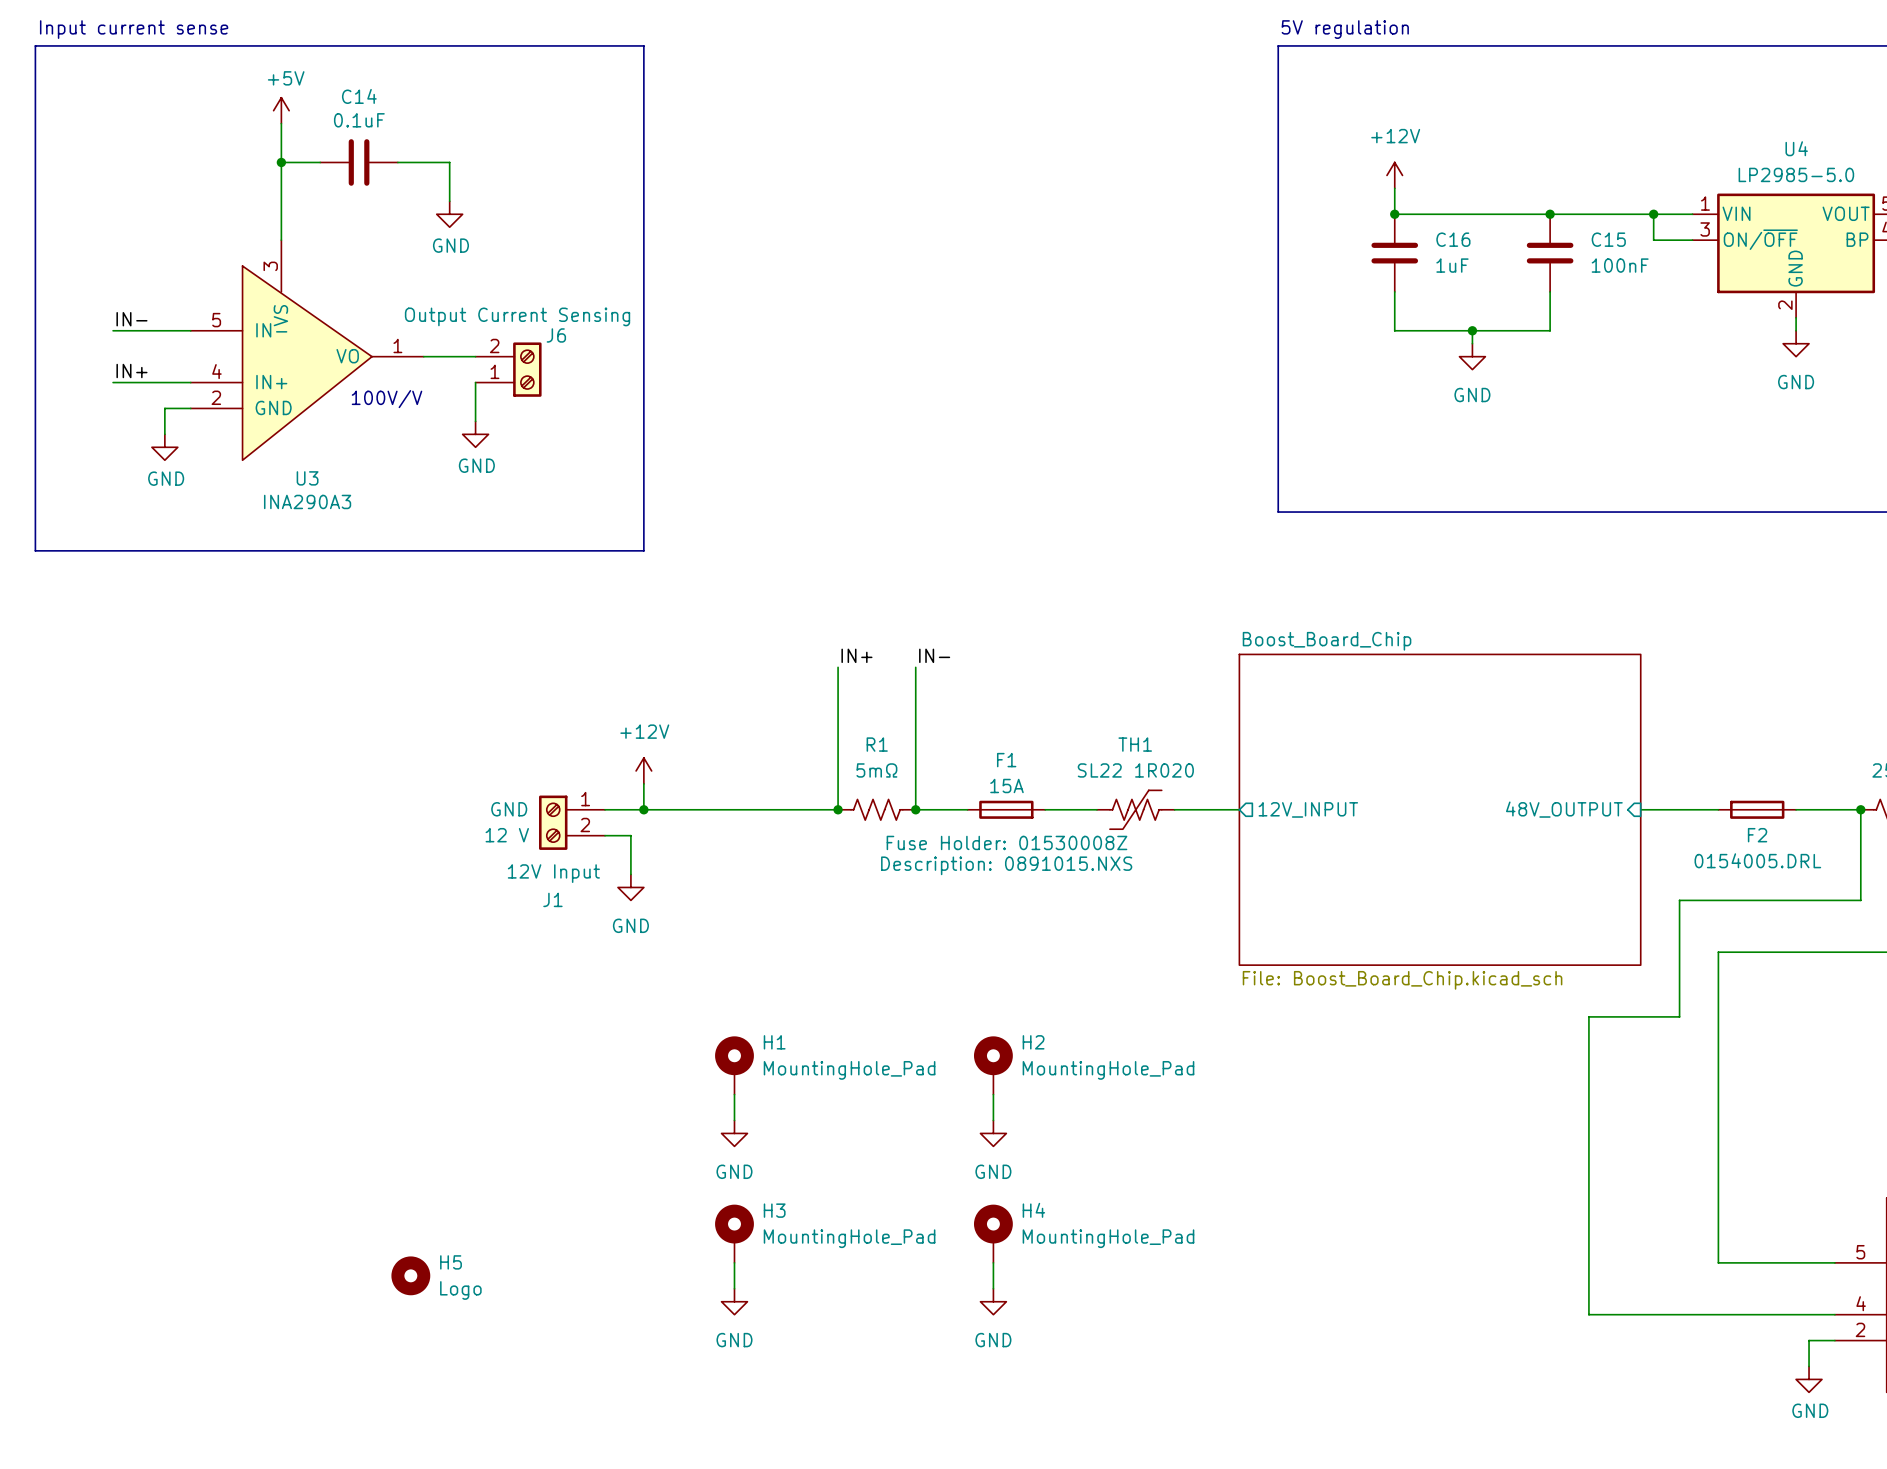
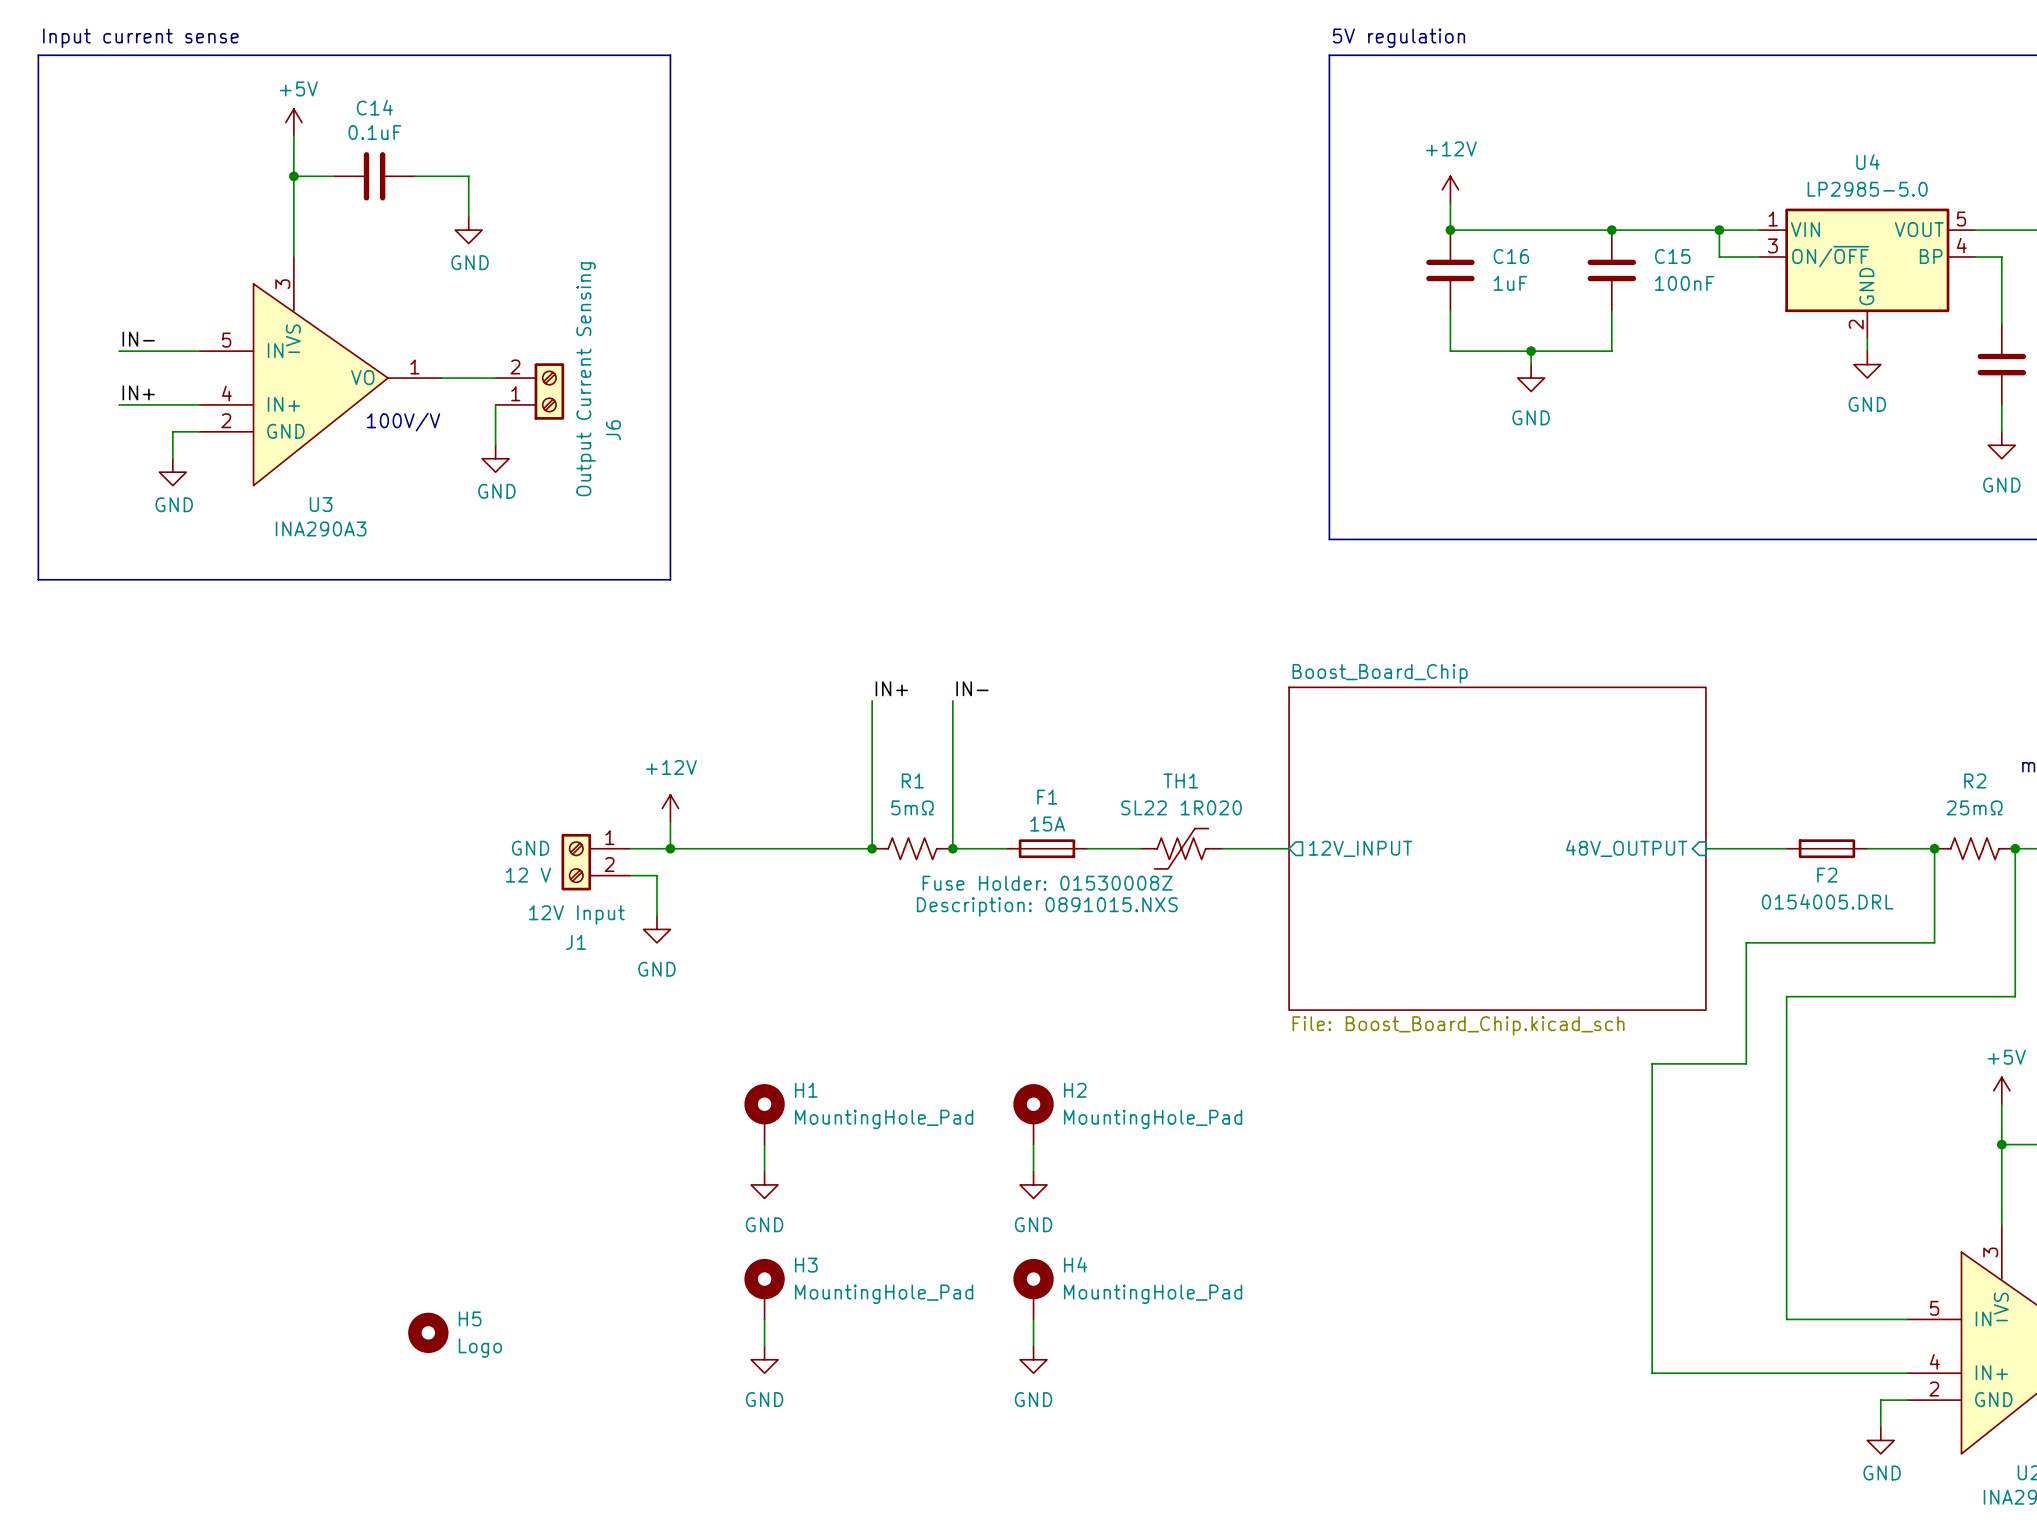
J6 value rotation: 0° (517, 316) -> 90° counterclockwise (586, 379)
J6 name rotation: 0° (556, 335) -> 90° counterclockwise (613, 430)
J6 name position: J6 (556, 335) -> J6 (613, 430)

